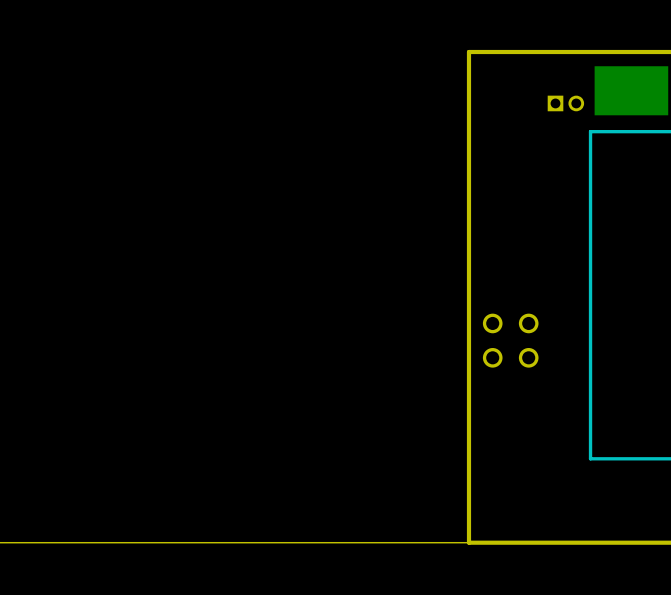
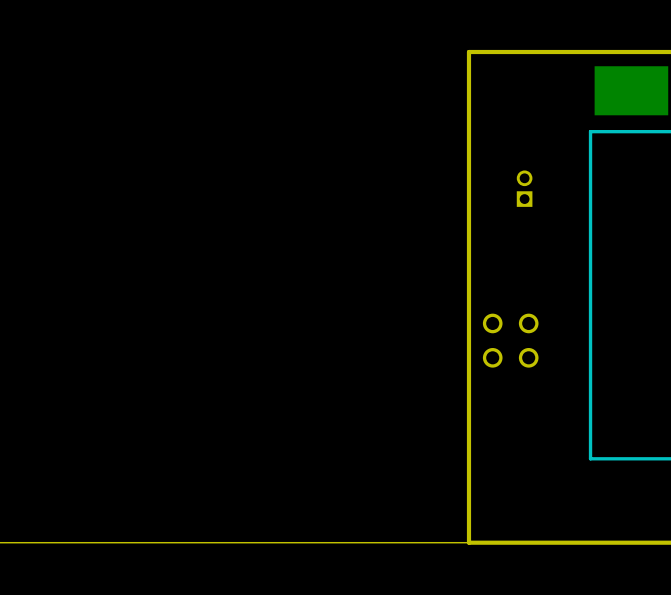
part rotation: 0° (565, 103) -> 90° counterclockwise (524, 188)
part position: (565, 103) -> (524, 188)

